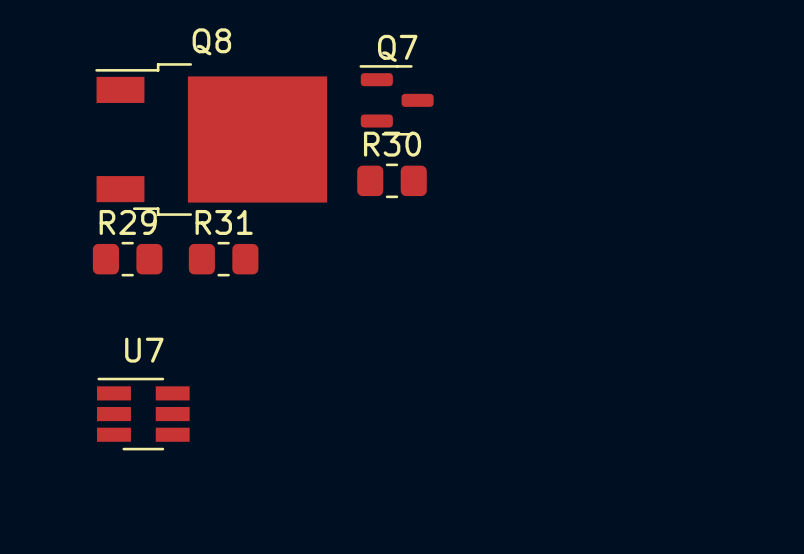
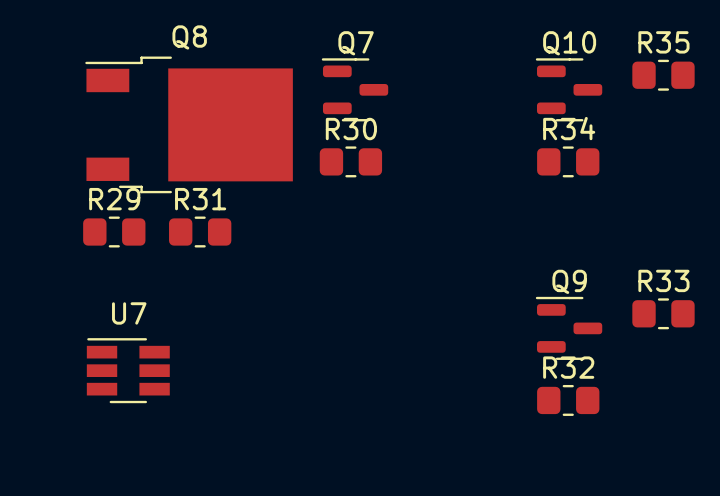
R35: none -> (663, 75)
Q10: none -> (569, 89)
R34: none -> (568, 161)
R33: none -> (663, 313)
Q9: none -> (569, 328)
R32: none -> (568, 400)

